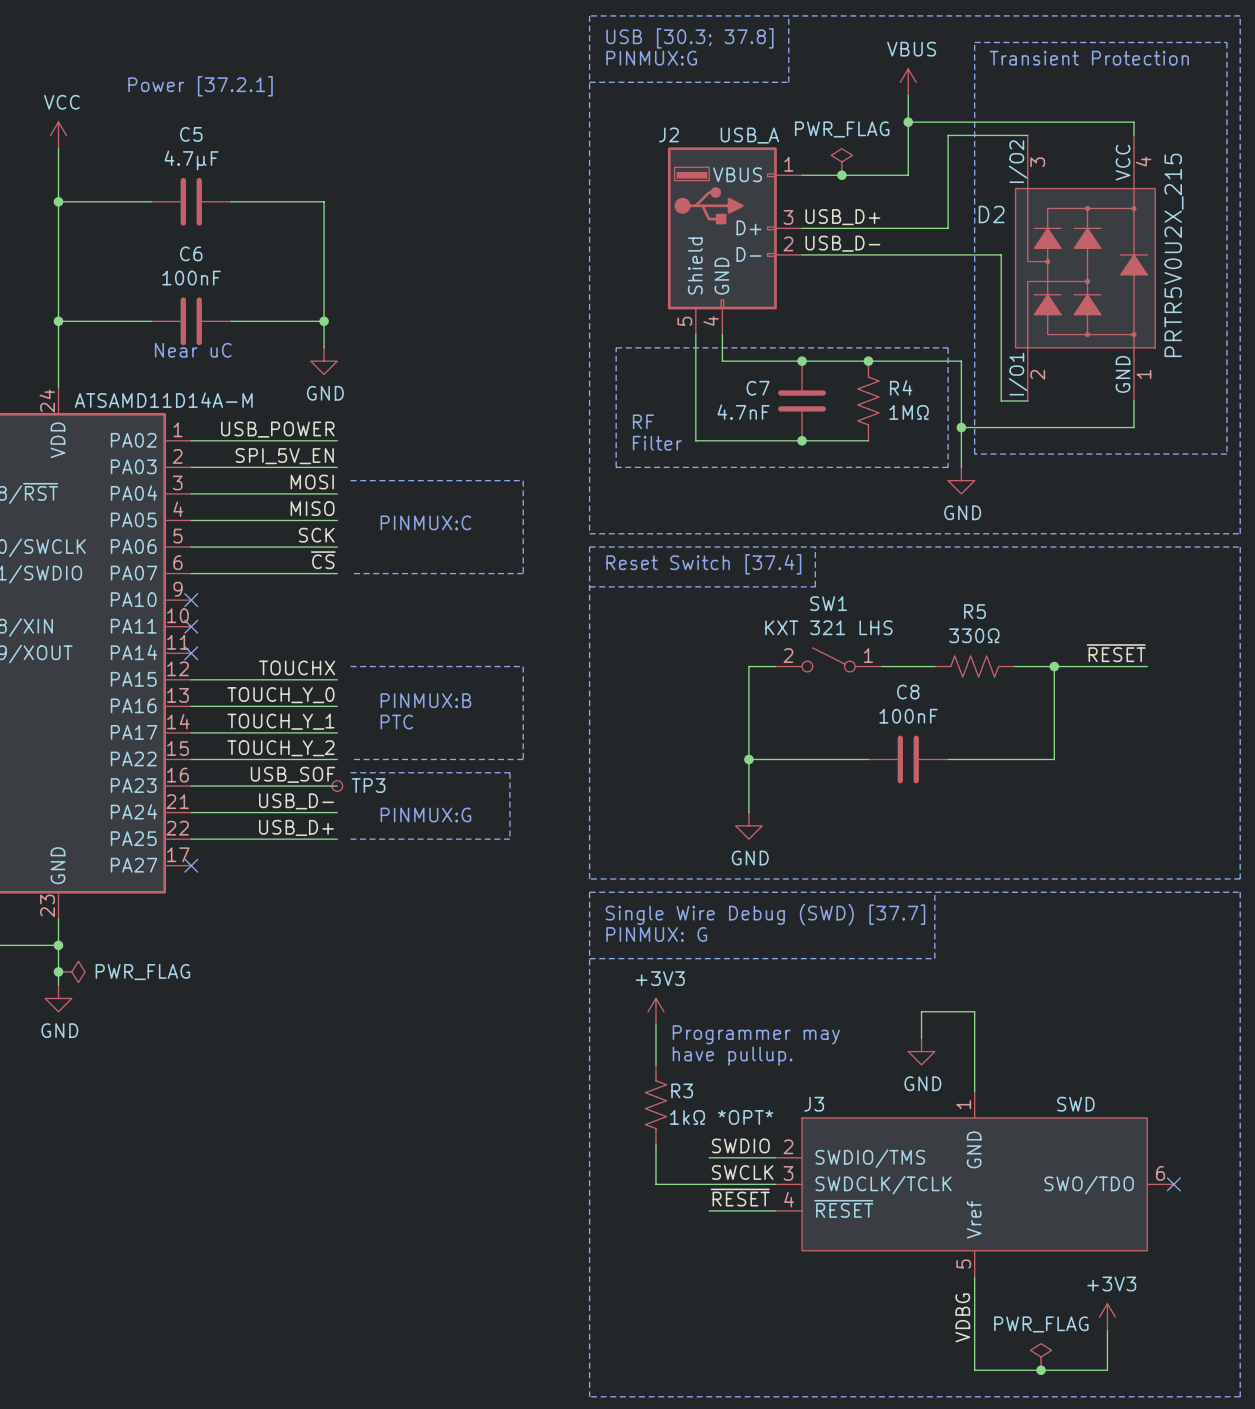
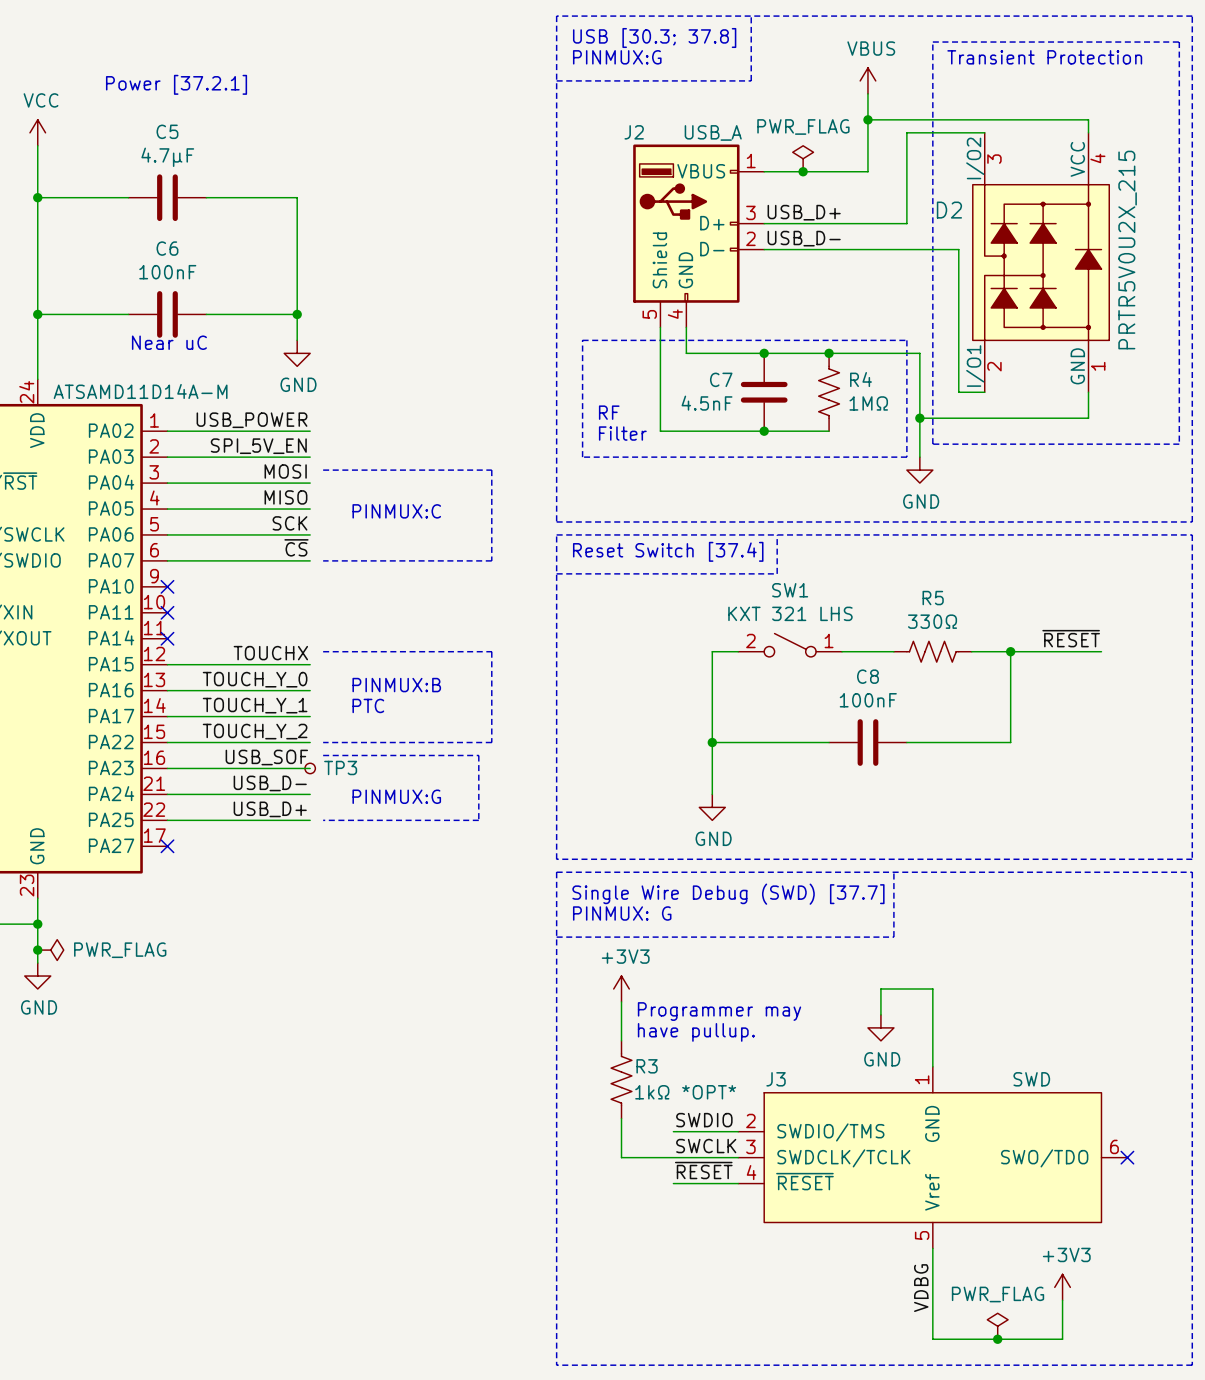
C7 value: 4.7nF (743, 412) -> 4.5nF (707, 403)

